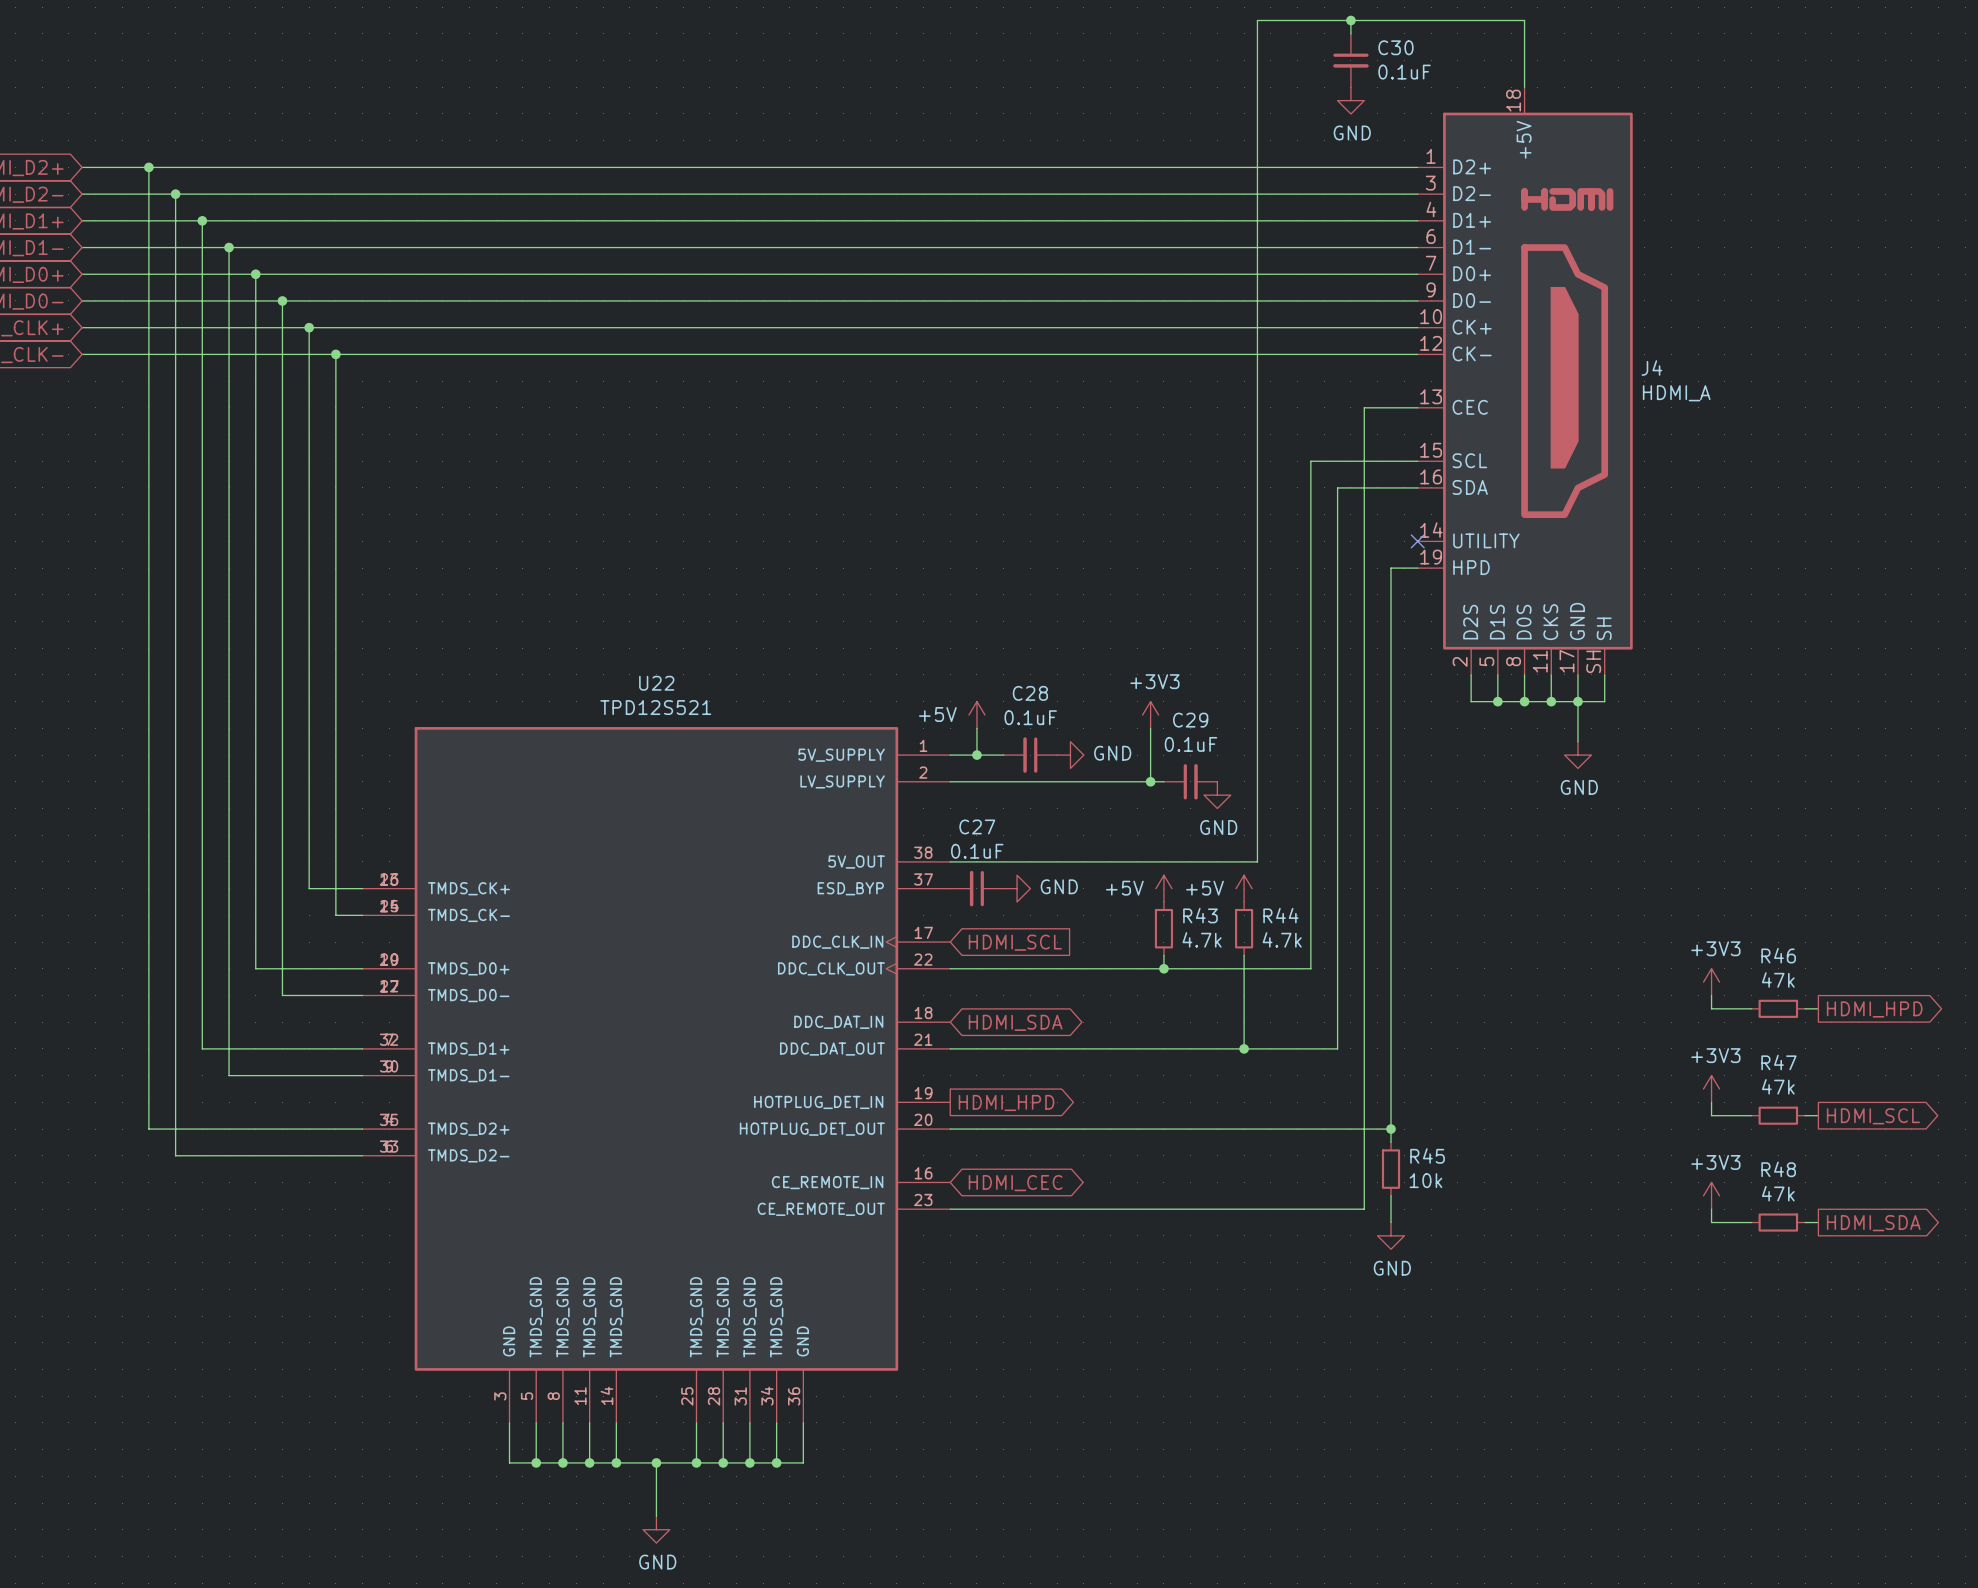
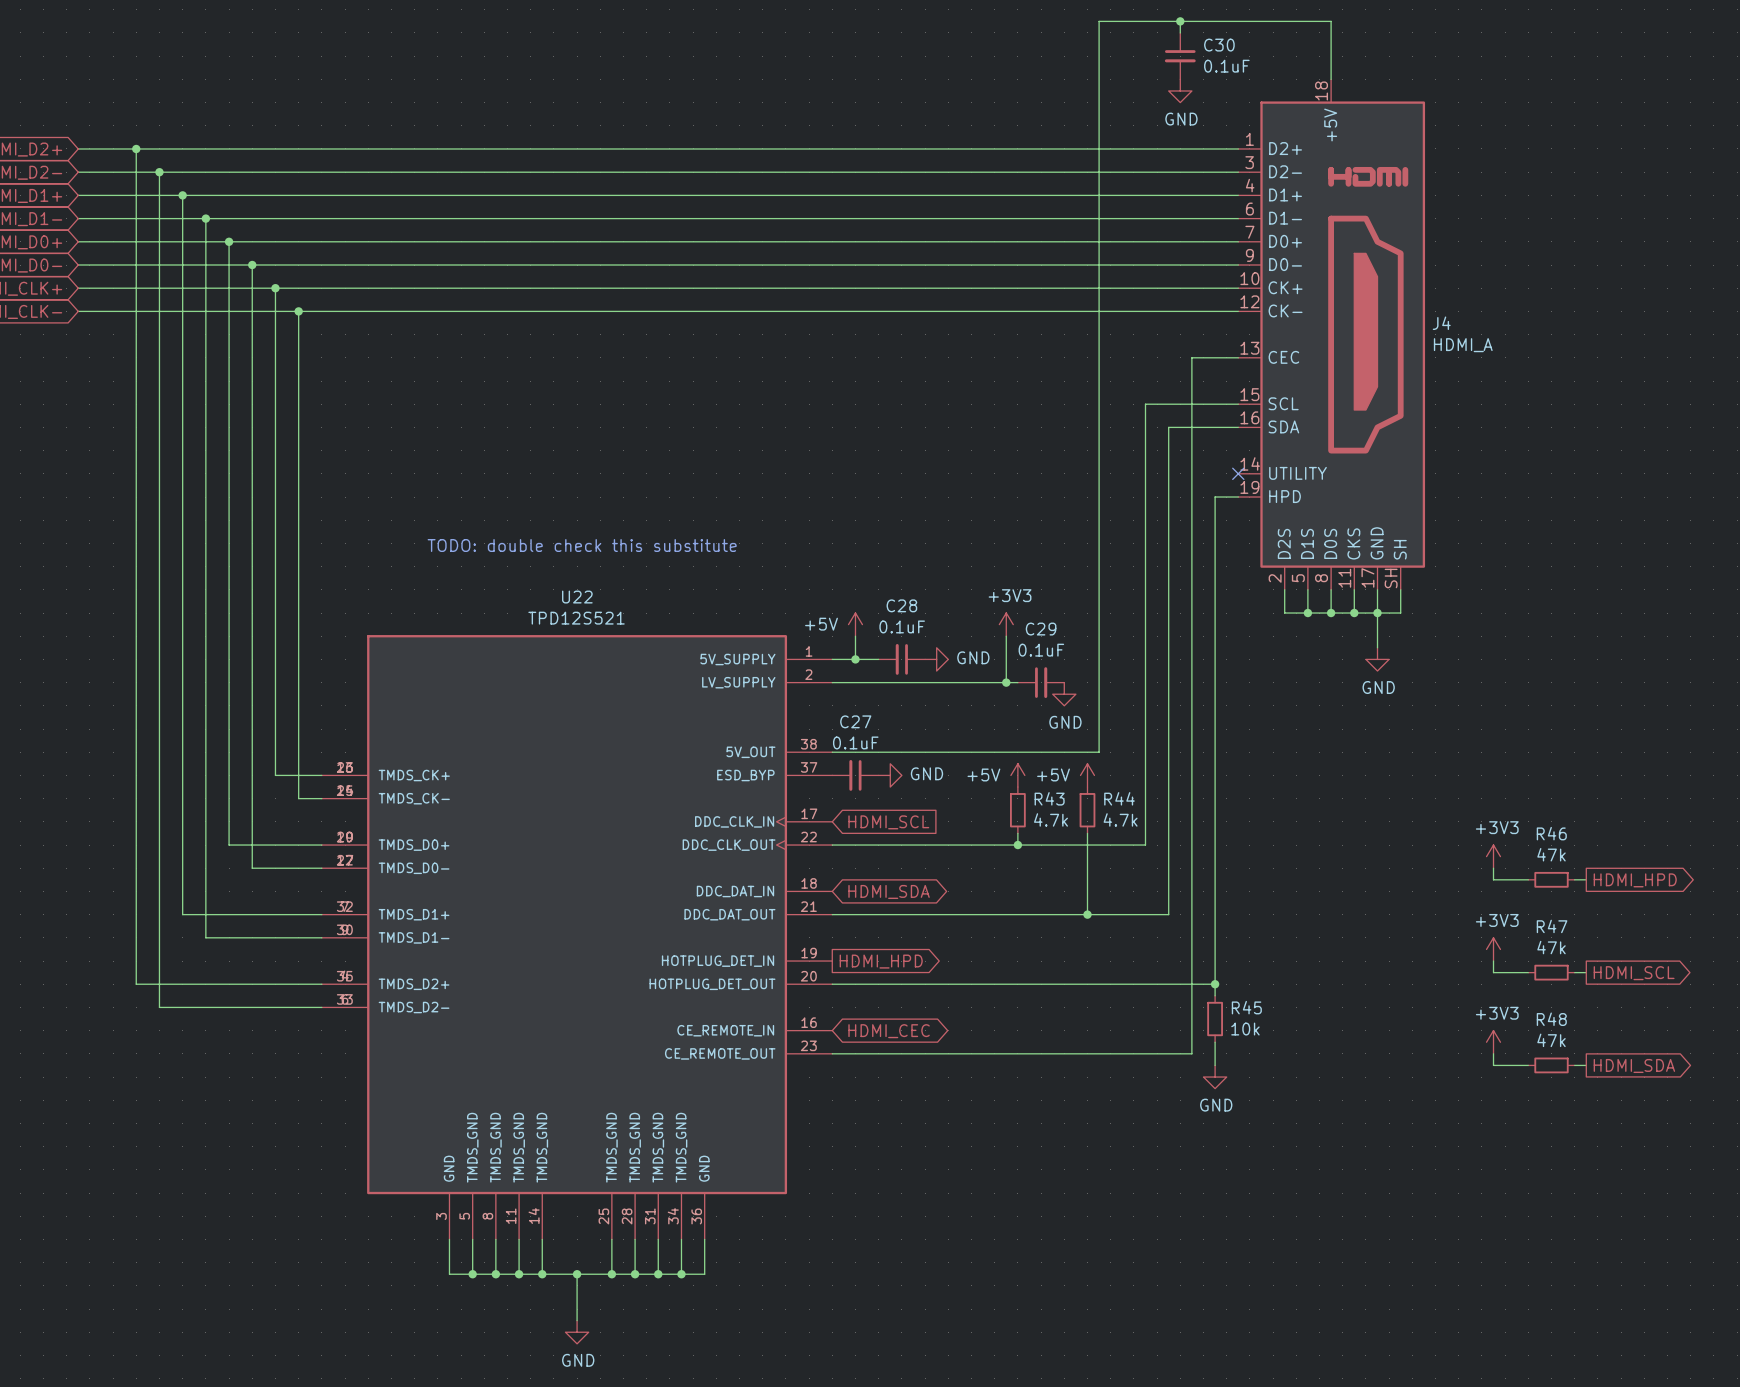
text: none -> TODO: double check this substitute (582, 545)

